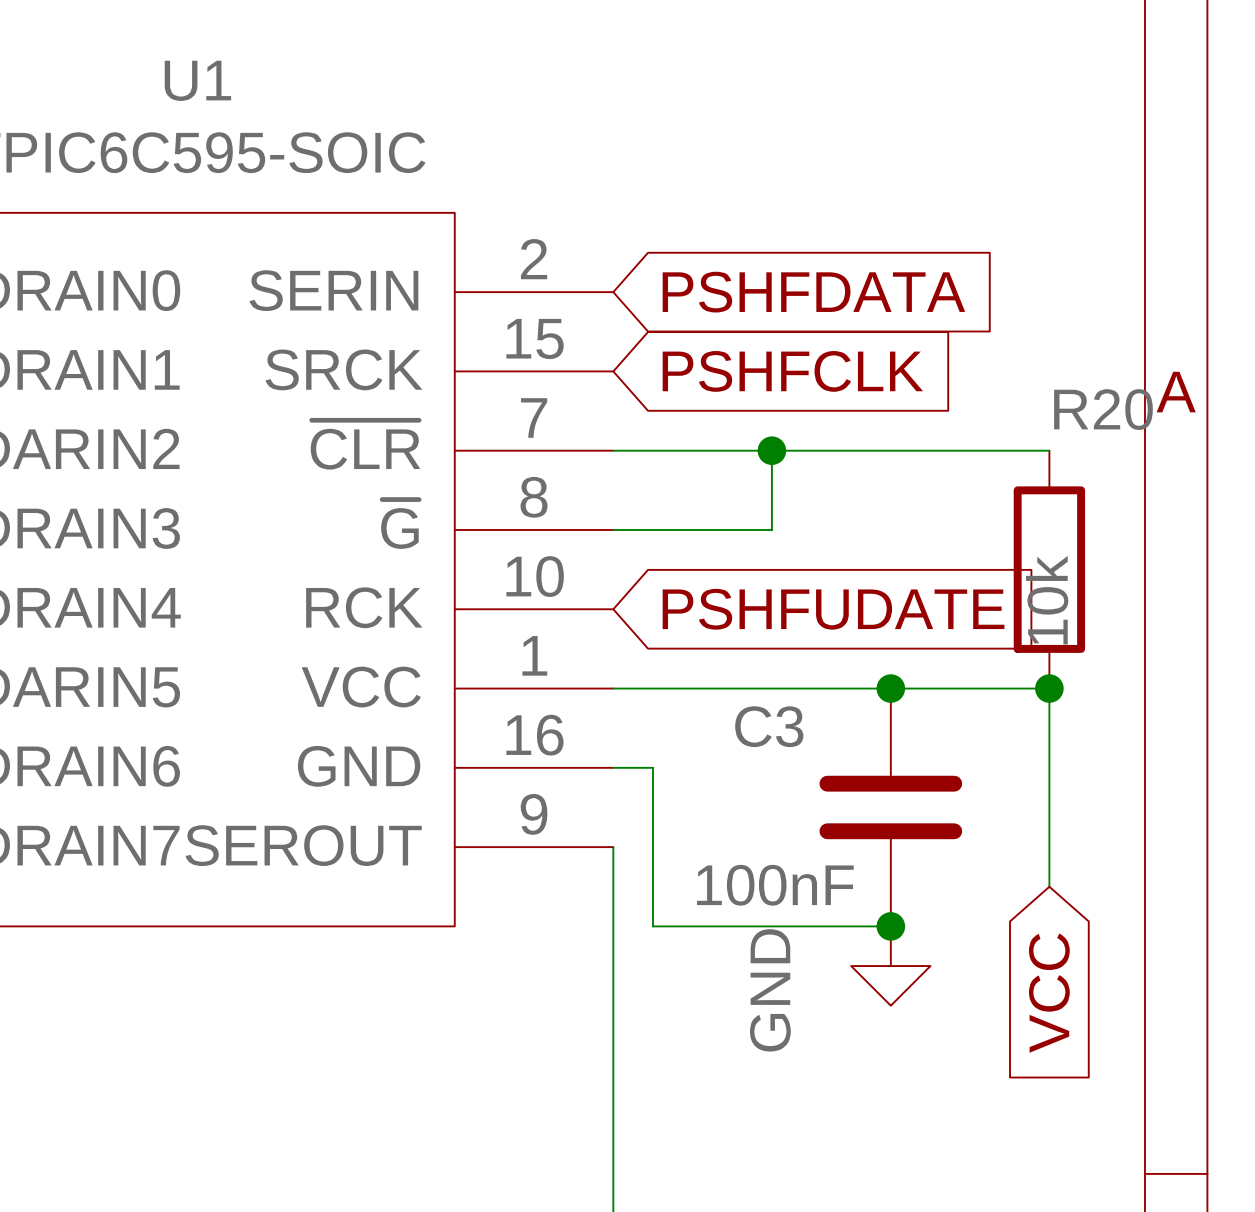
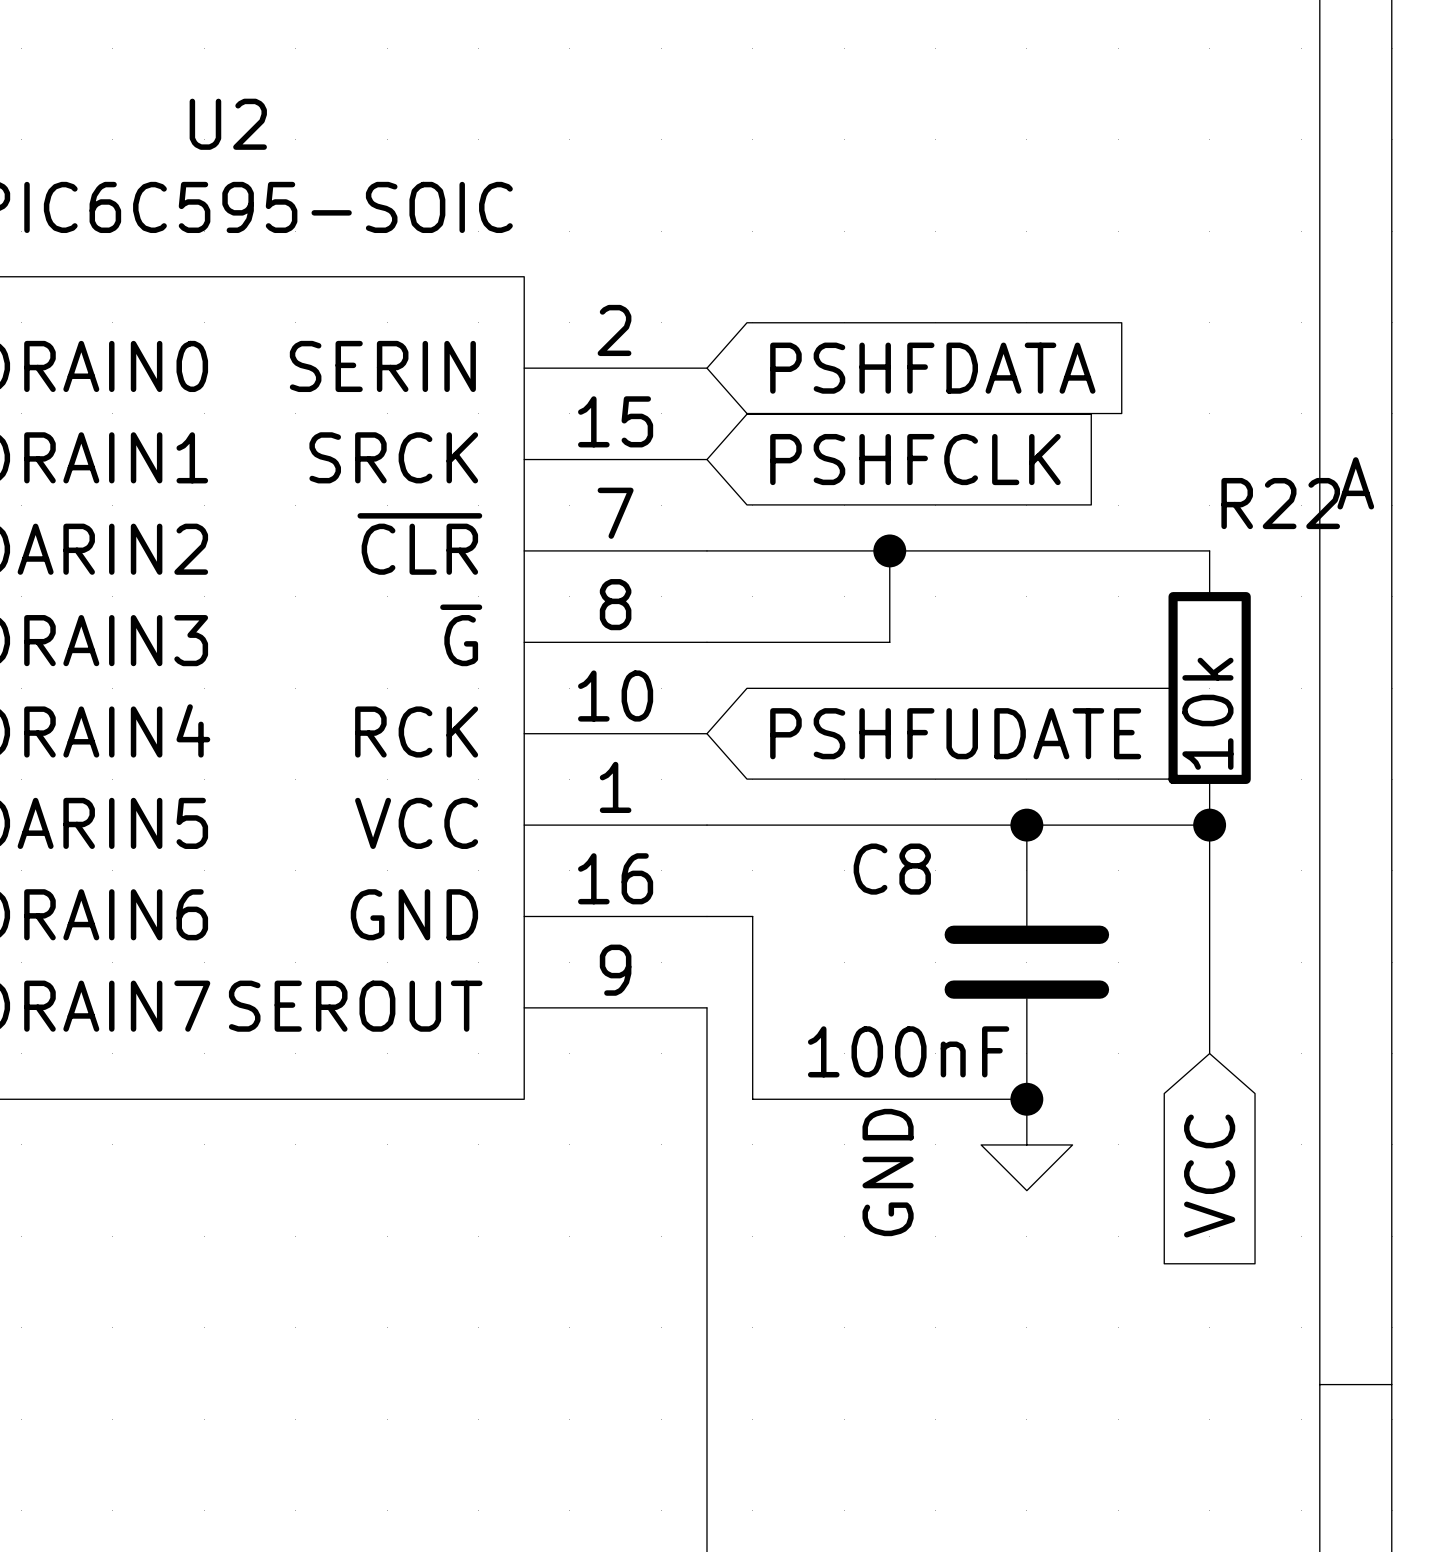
U1 name: U1 (197, 80) -> U2 (228, 124)
R20 name: R20 (1103, 409) -> R22 (1280, 503)
C3 name: C3 (769, 726) -> C8 (892, 869)

